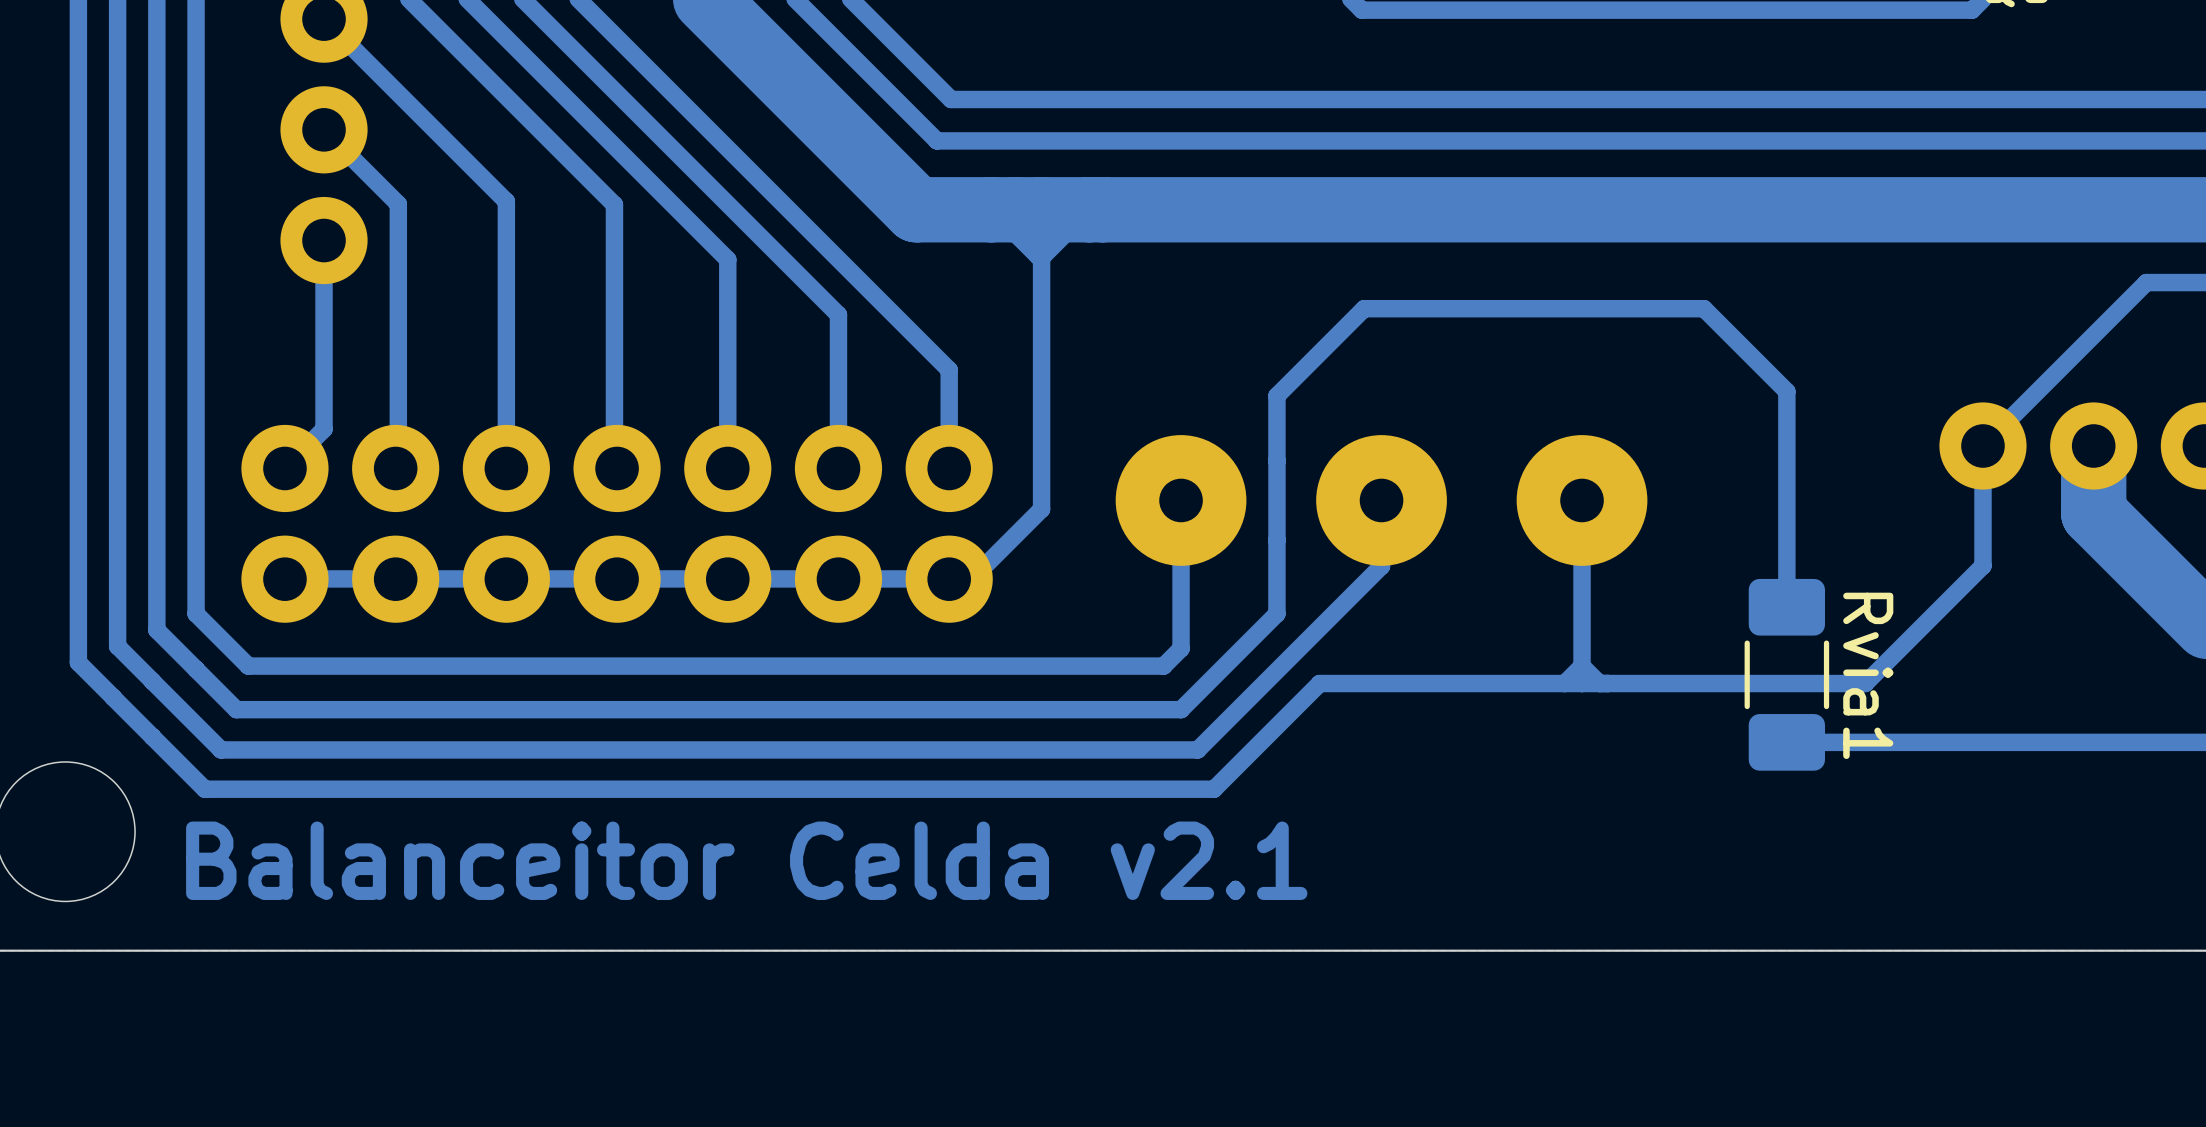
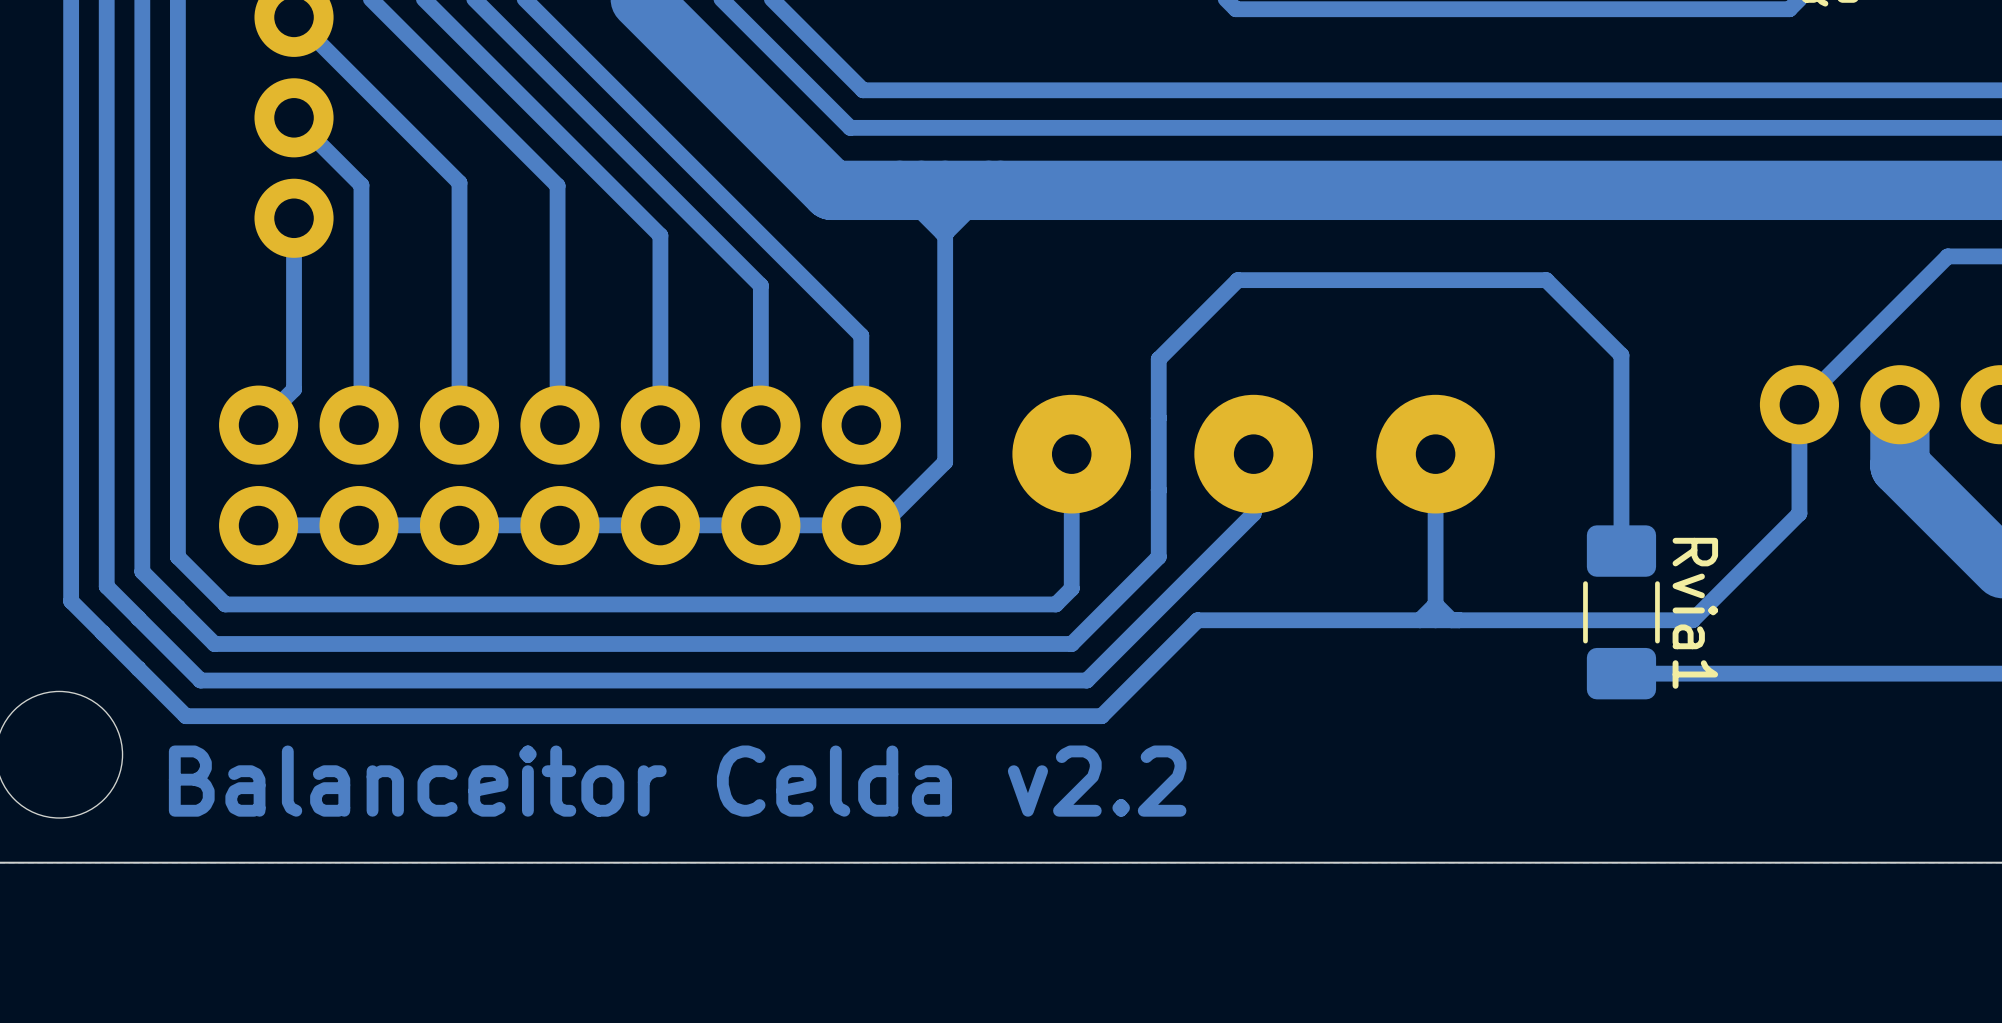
text: Balanceitor Celda v2.1 (746, 860) -> Balanceitor Celda v2.2 (677, 781)

